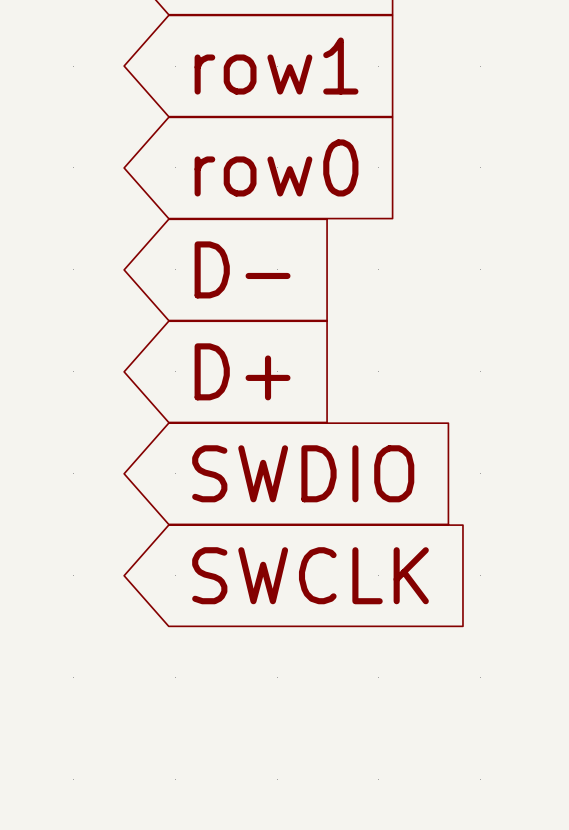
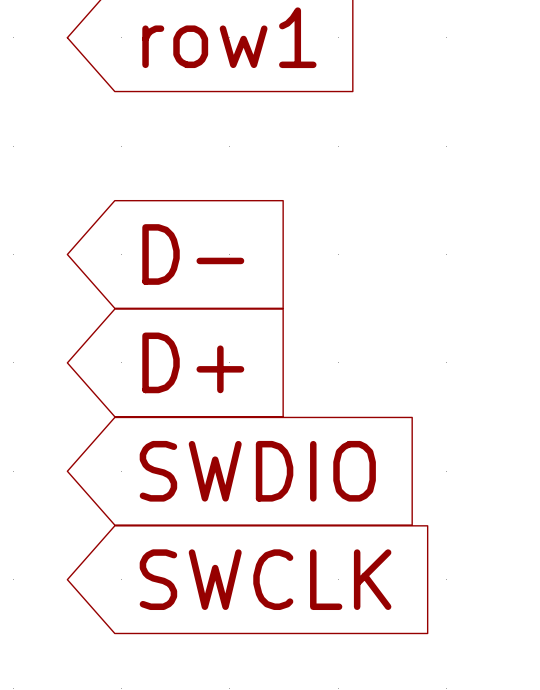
global label: row0 (276, 167) -> none

